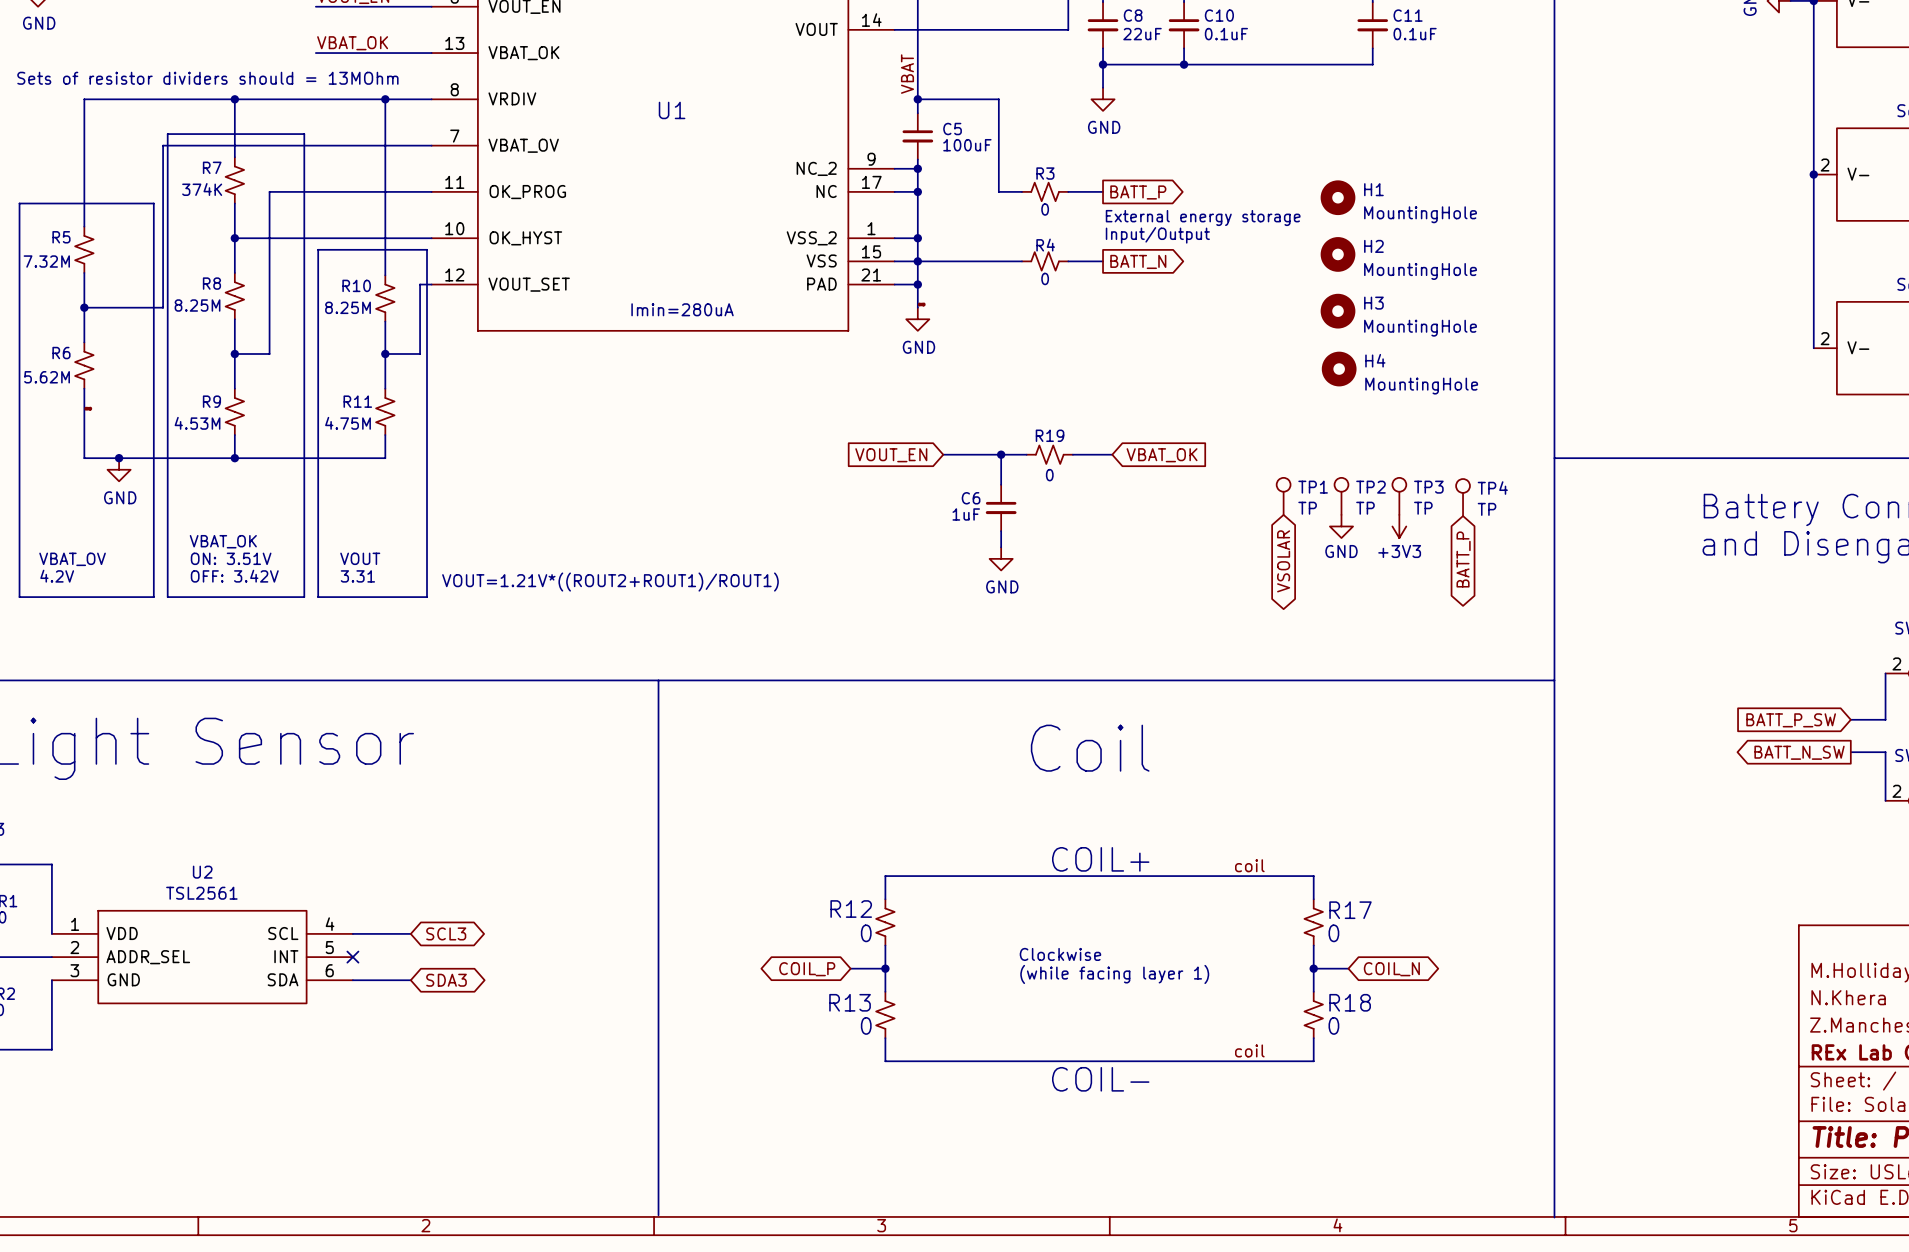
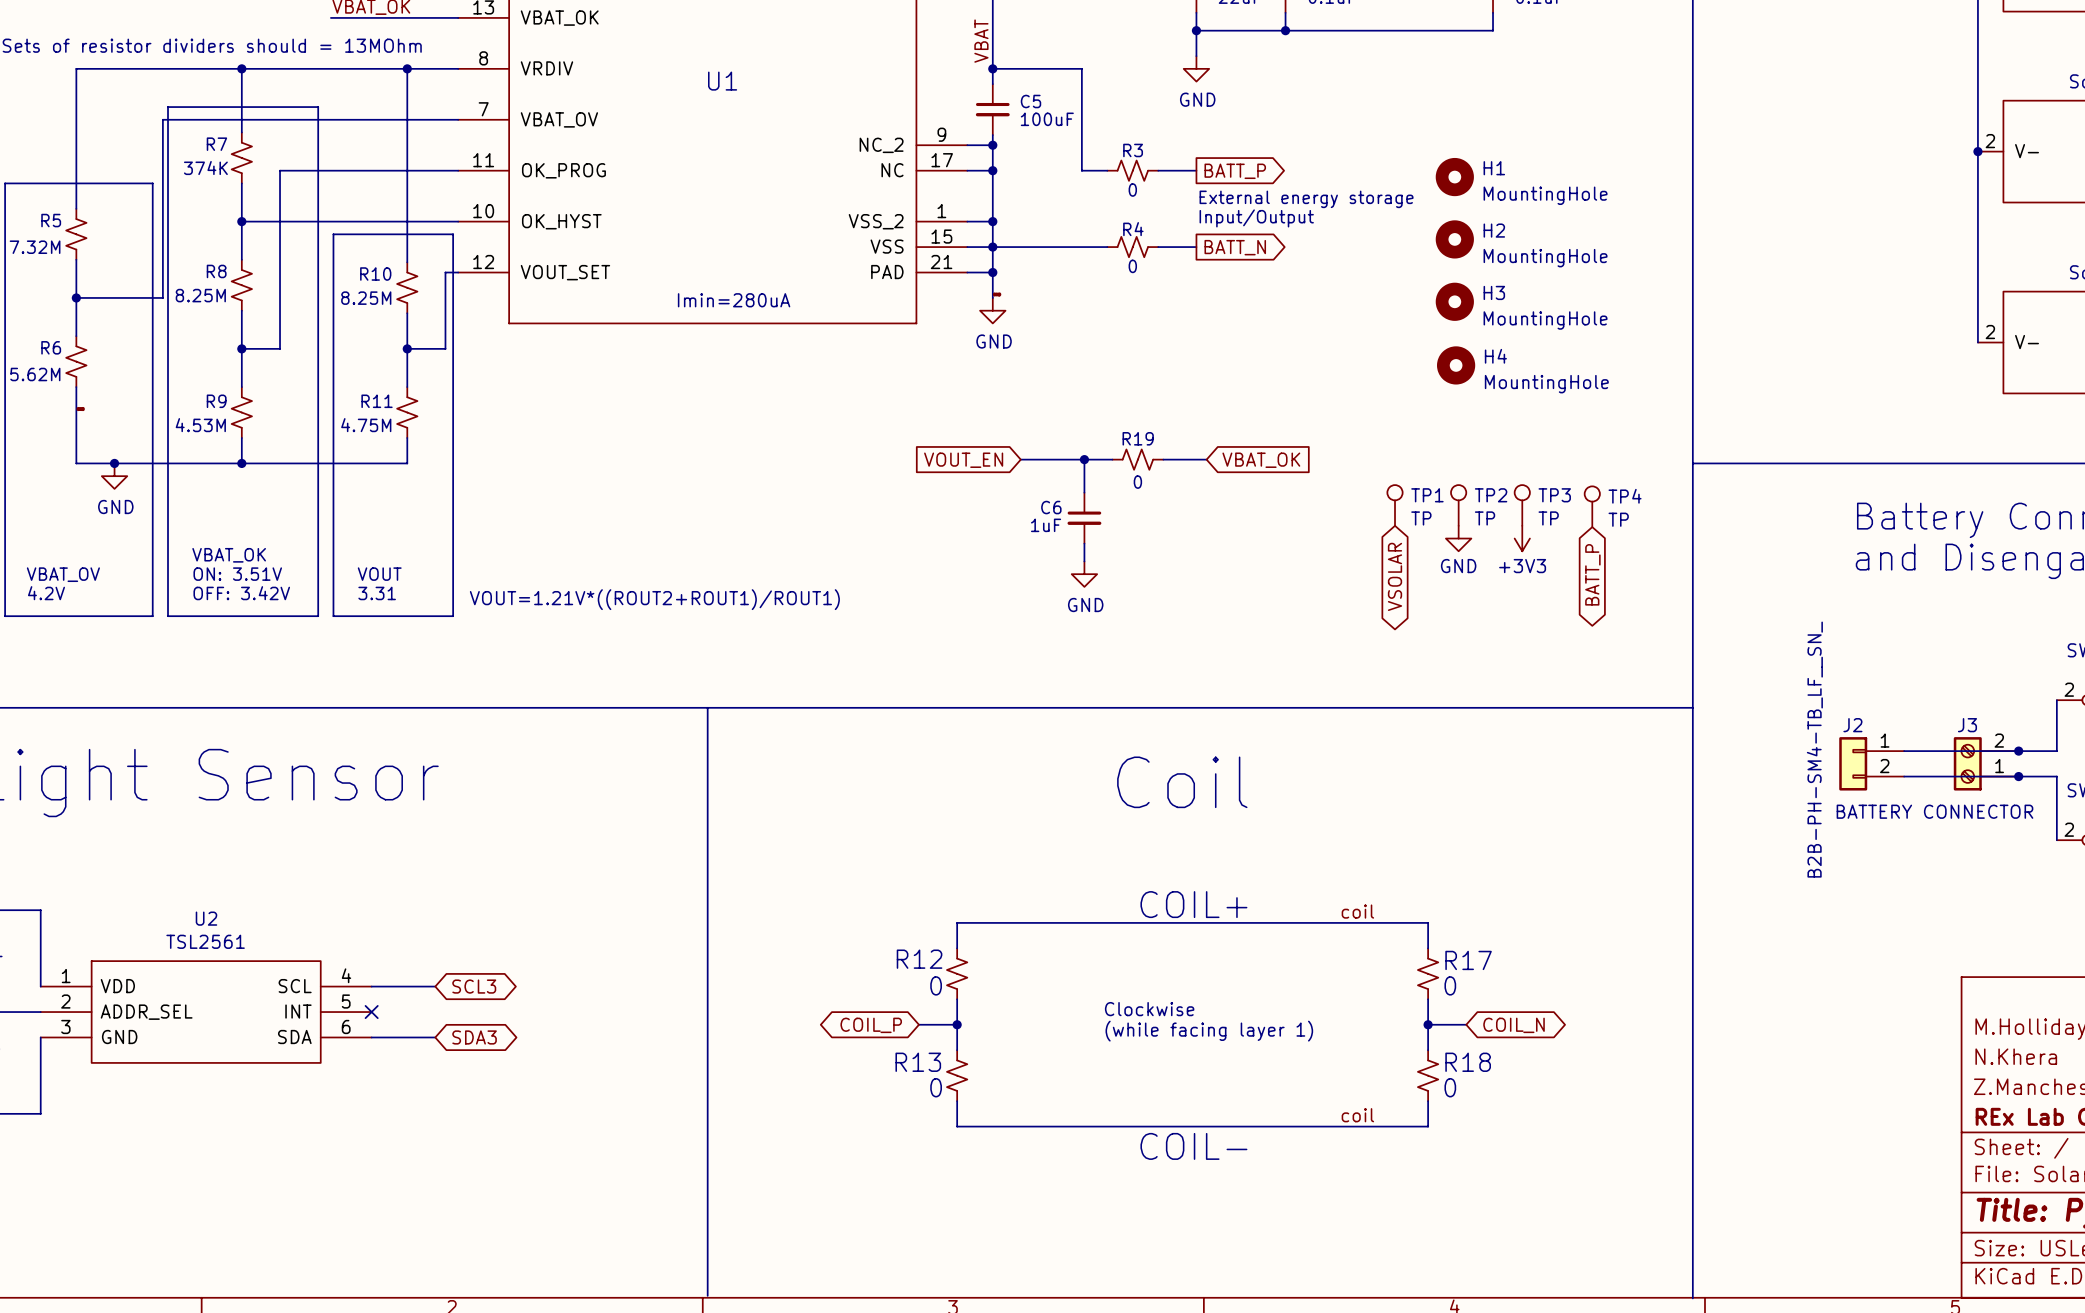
wire: none -> (1904, 751) (2018, 751)
junction: none -> (2018, 751)
global label: BATT_P_SW (1791, 720) -> none
J2: none -> B2B-PH-SM4-TB_LF__SN_ (1871, 763)
J3: none -> BATTERY CONNECTOR (1986, 763)
junction: none -> (2018, 776)
global label: BATT_N_SW (1799, 752) -> none
wire: (1850, 752) (1885, 752) -> (1904, 776) (2056, 776) (2056, 786)

